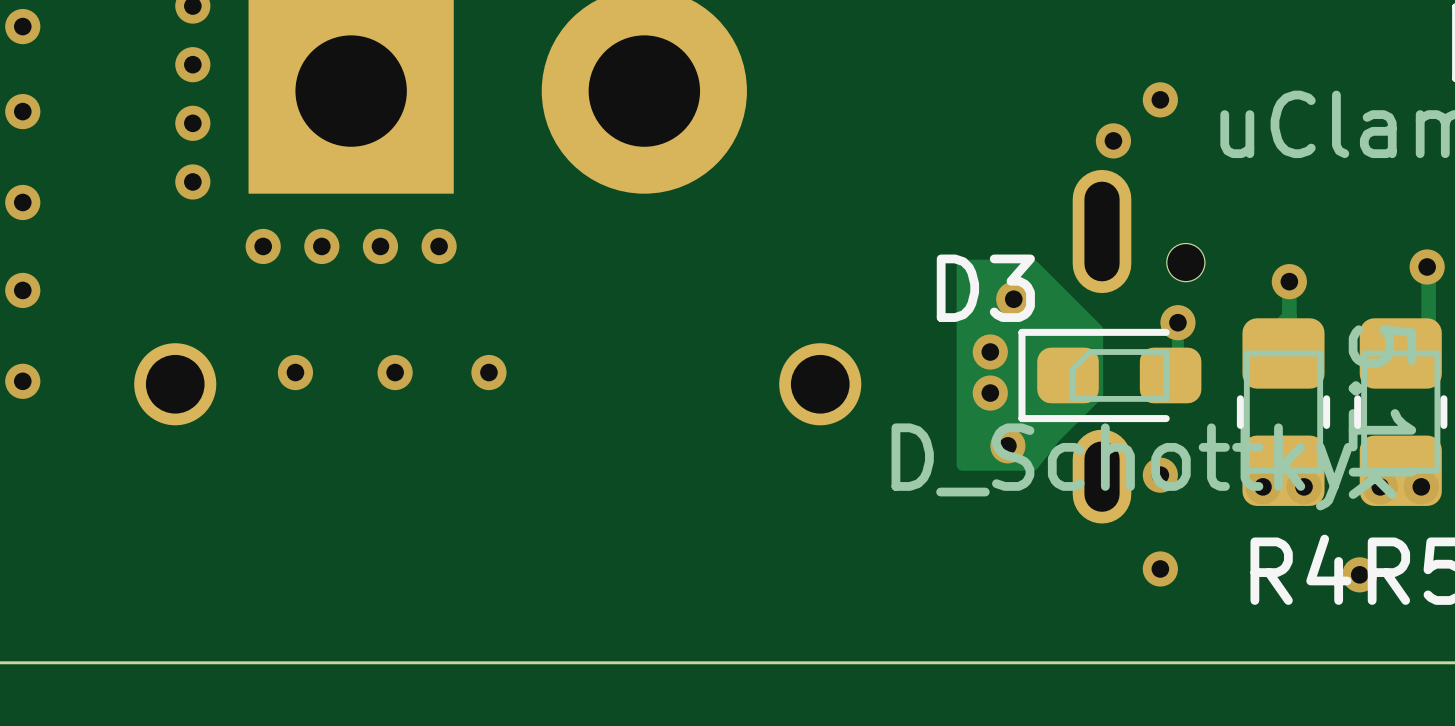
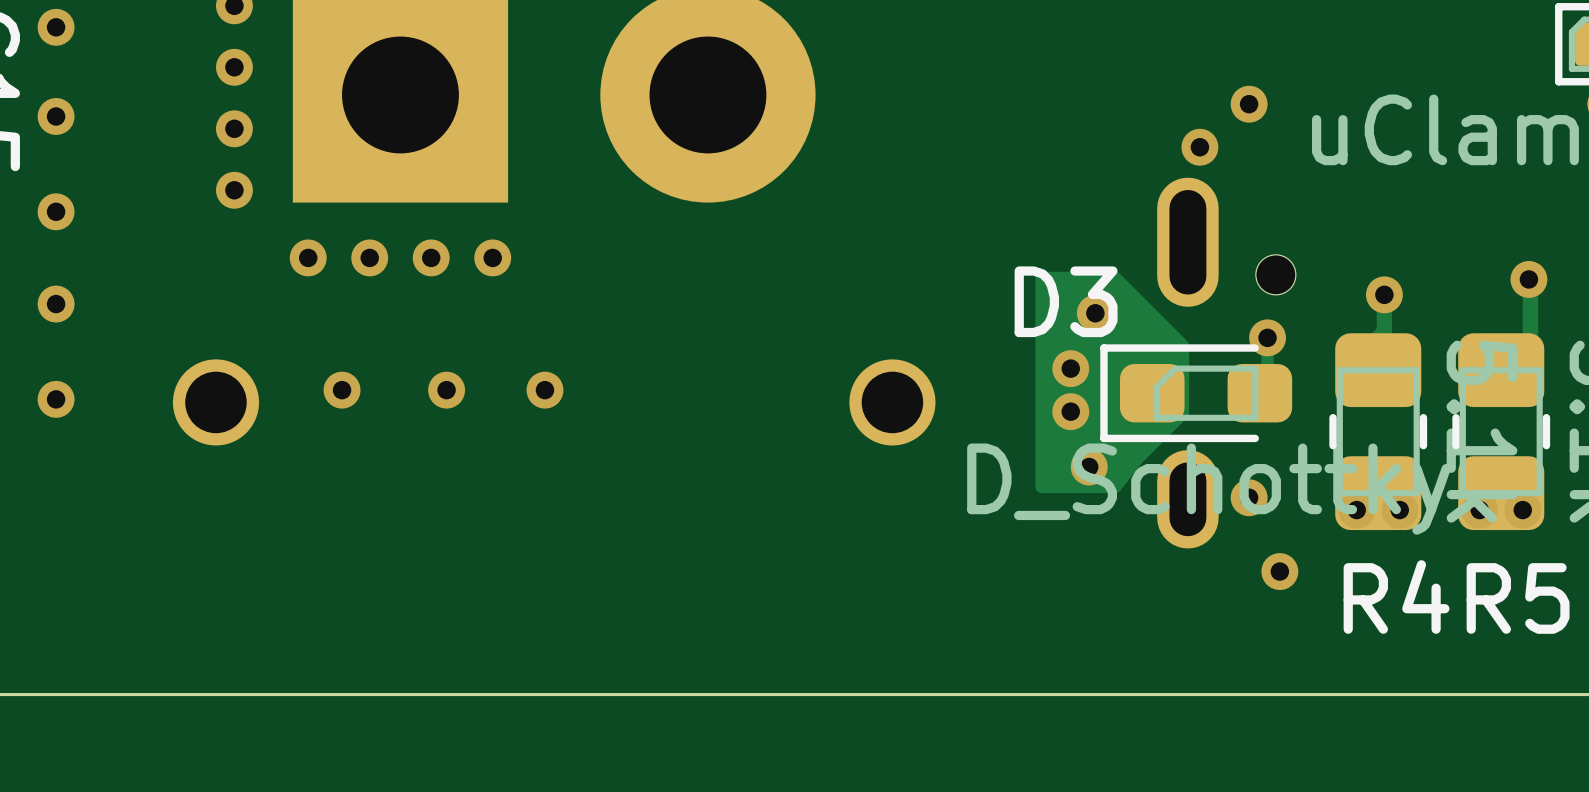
via position: (1160, 568) -> (1279, 571)
via: (1359, 574) -> none

